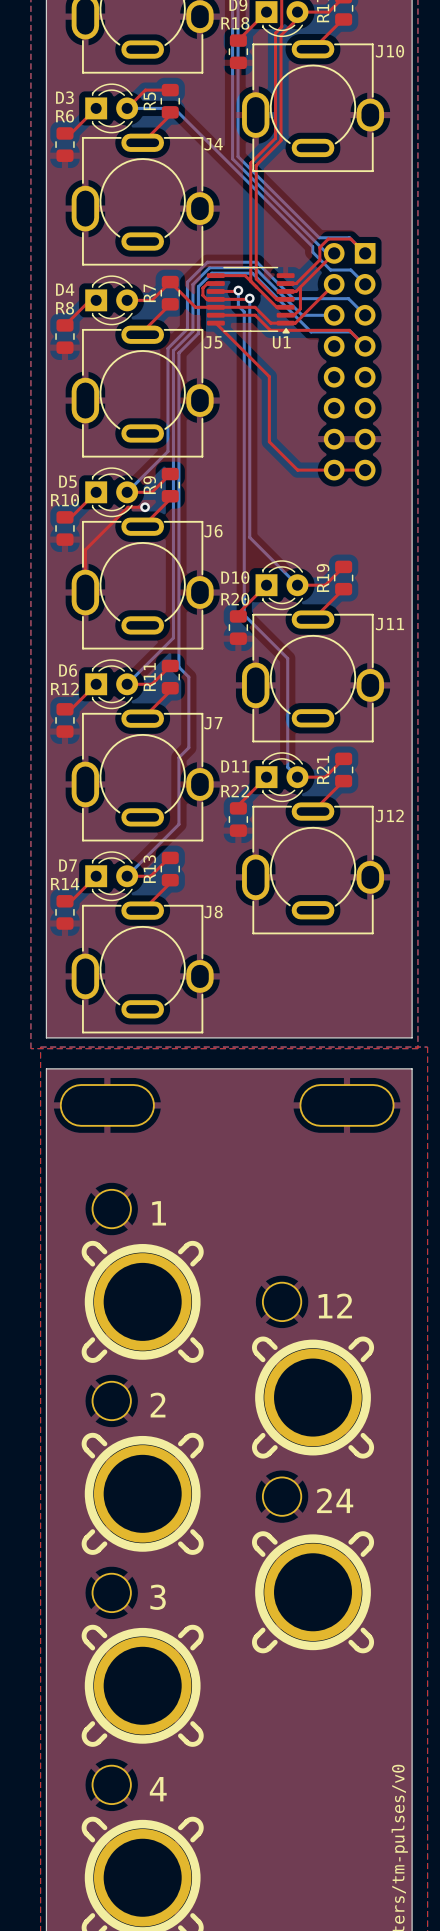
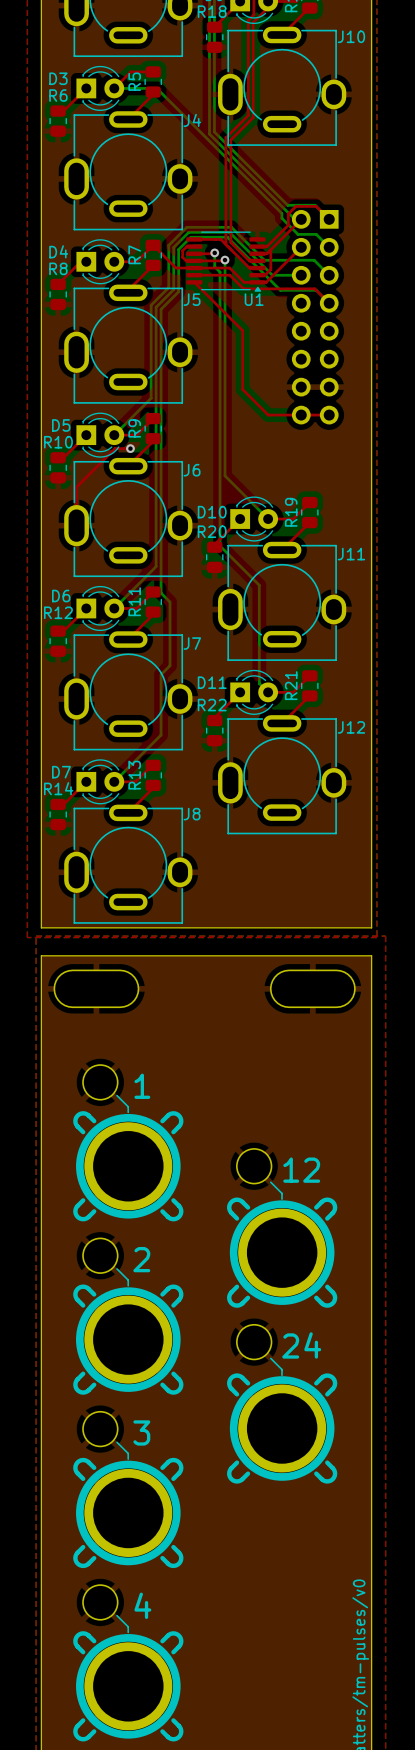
line: none -> (117, 1095) (128, 1106) (128, 1112)
line: none -> (270, 1182) (281, 1193) (281, 1199)
line: none -> (117, 1268) (128, 1280) (128, 1285)
line: none -> (270, 1358) (281, 1369) (281, 1375)
line: none -> (117, 1442) (128, 1453) (128, 1459)
line: none -> (117, 1615) (128, 1626) (128, 1632)

